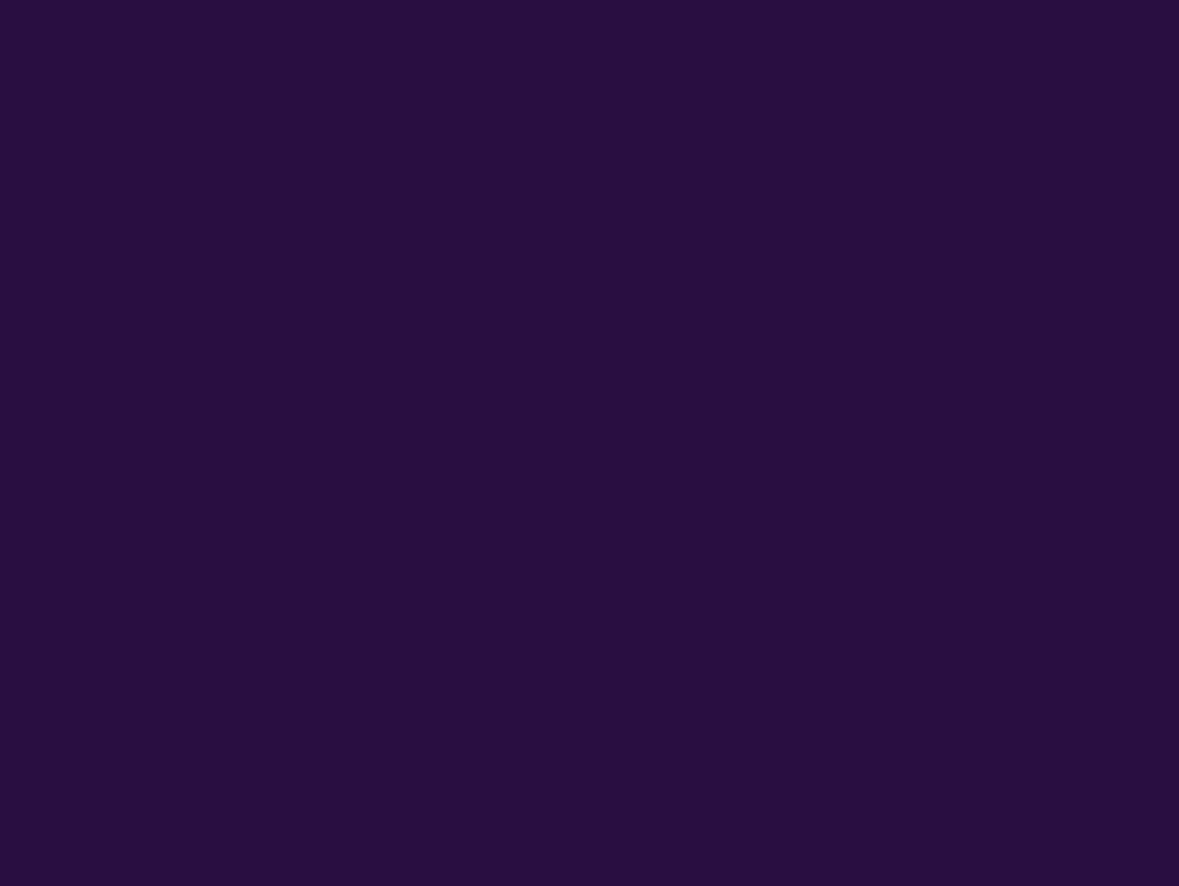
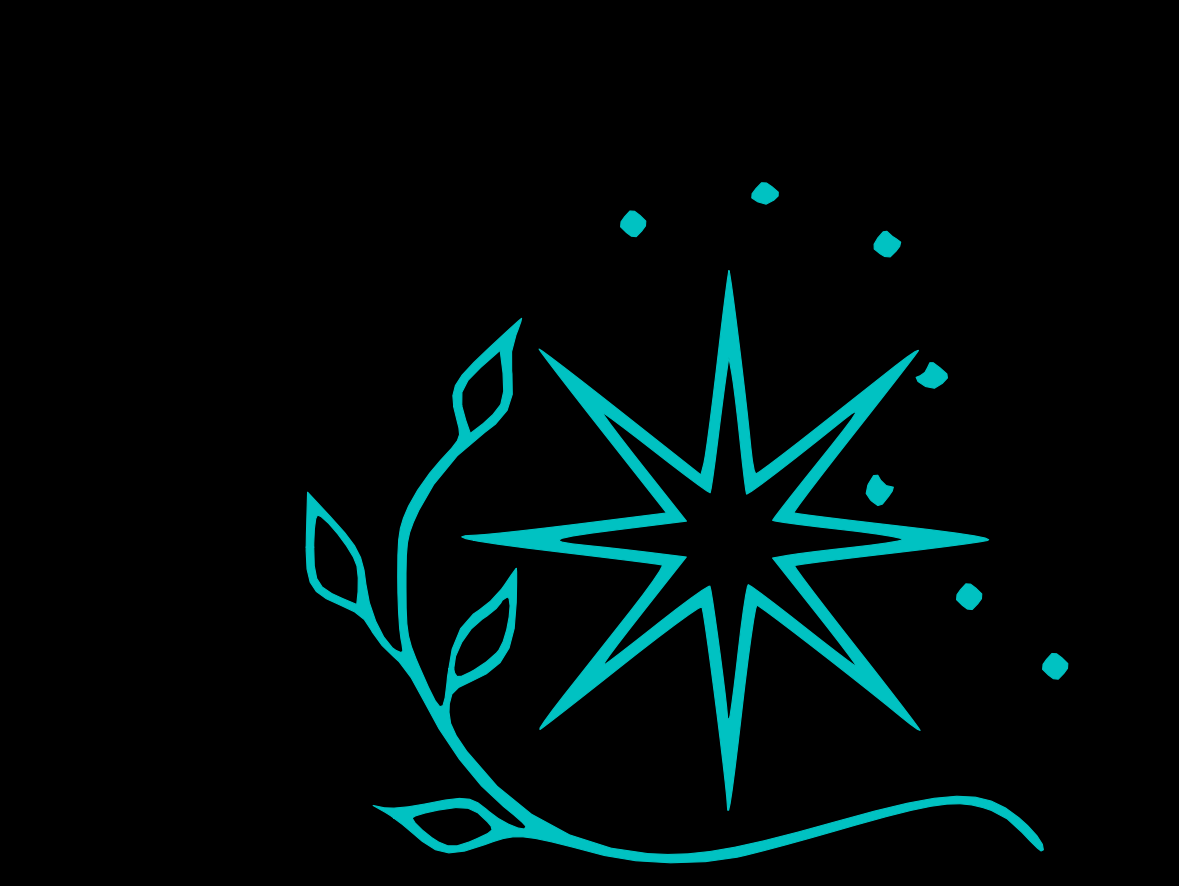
drawing: none -> [305, 182, 1069, 864]

